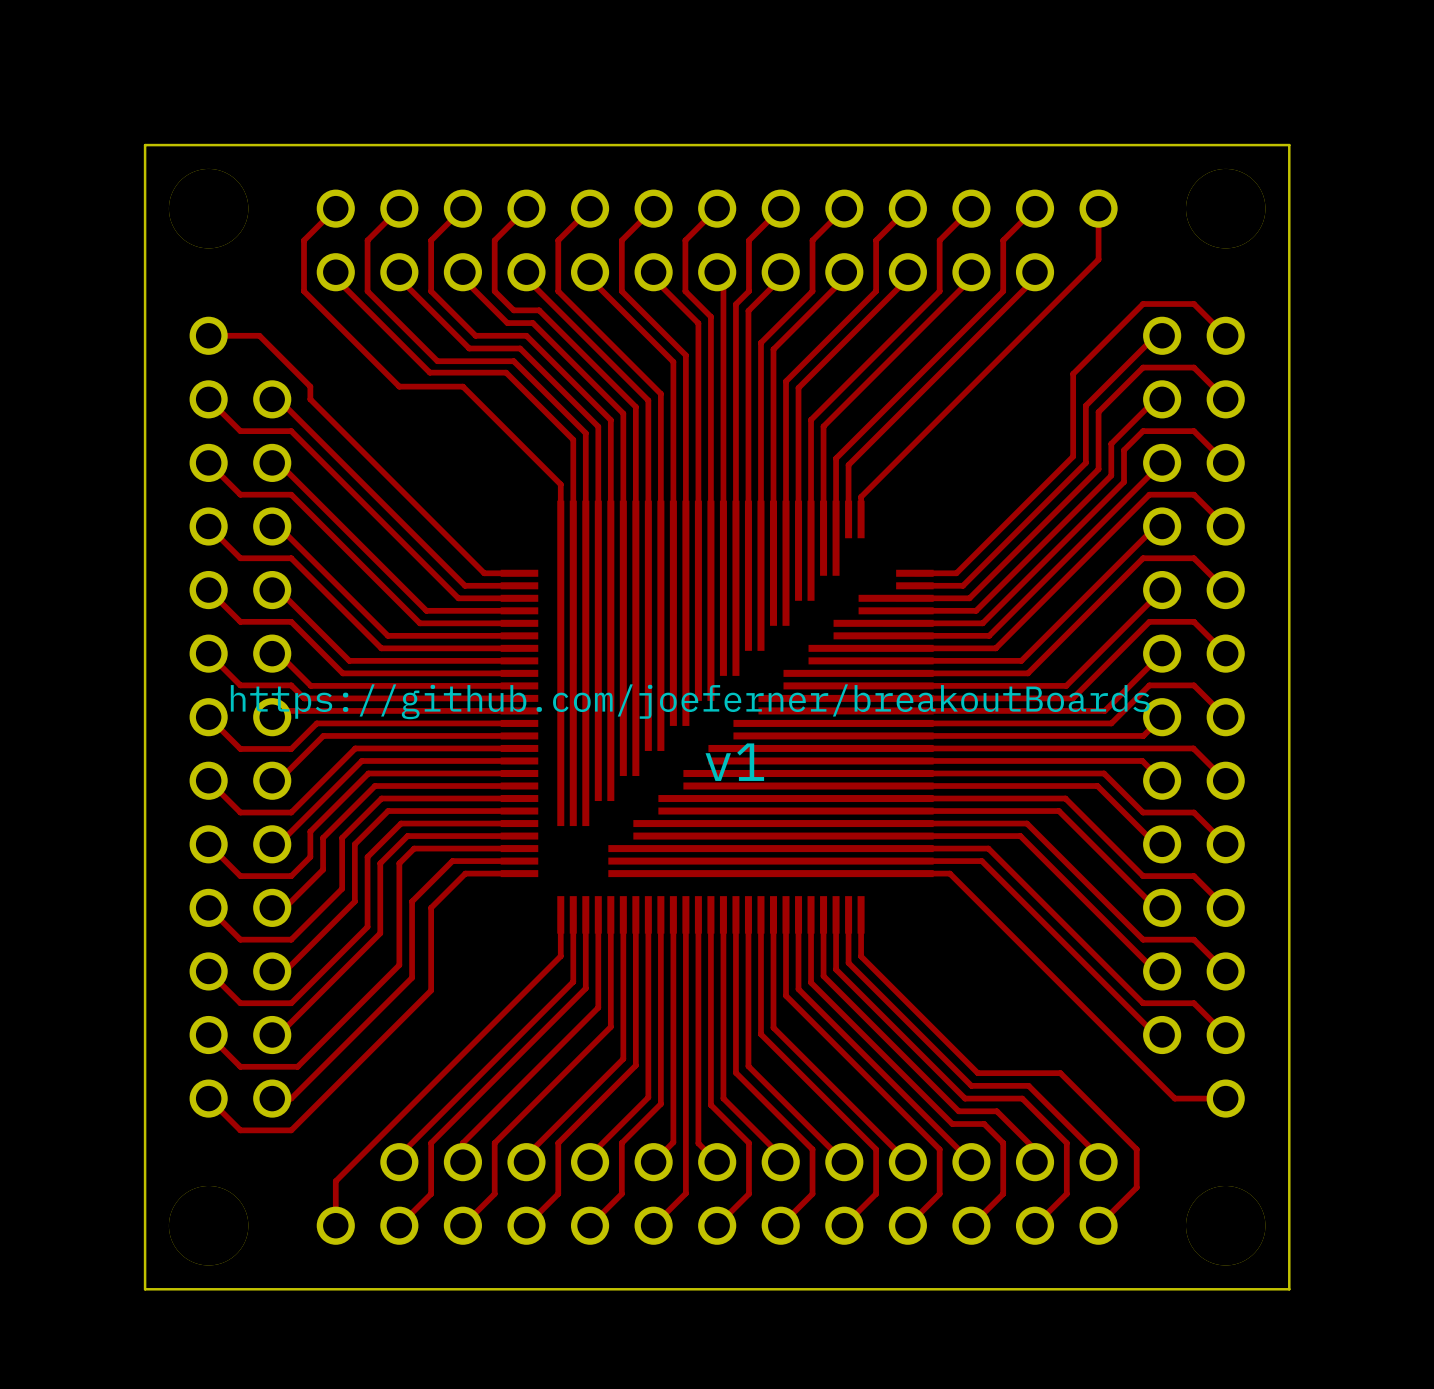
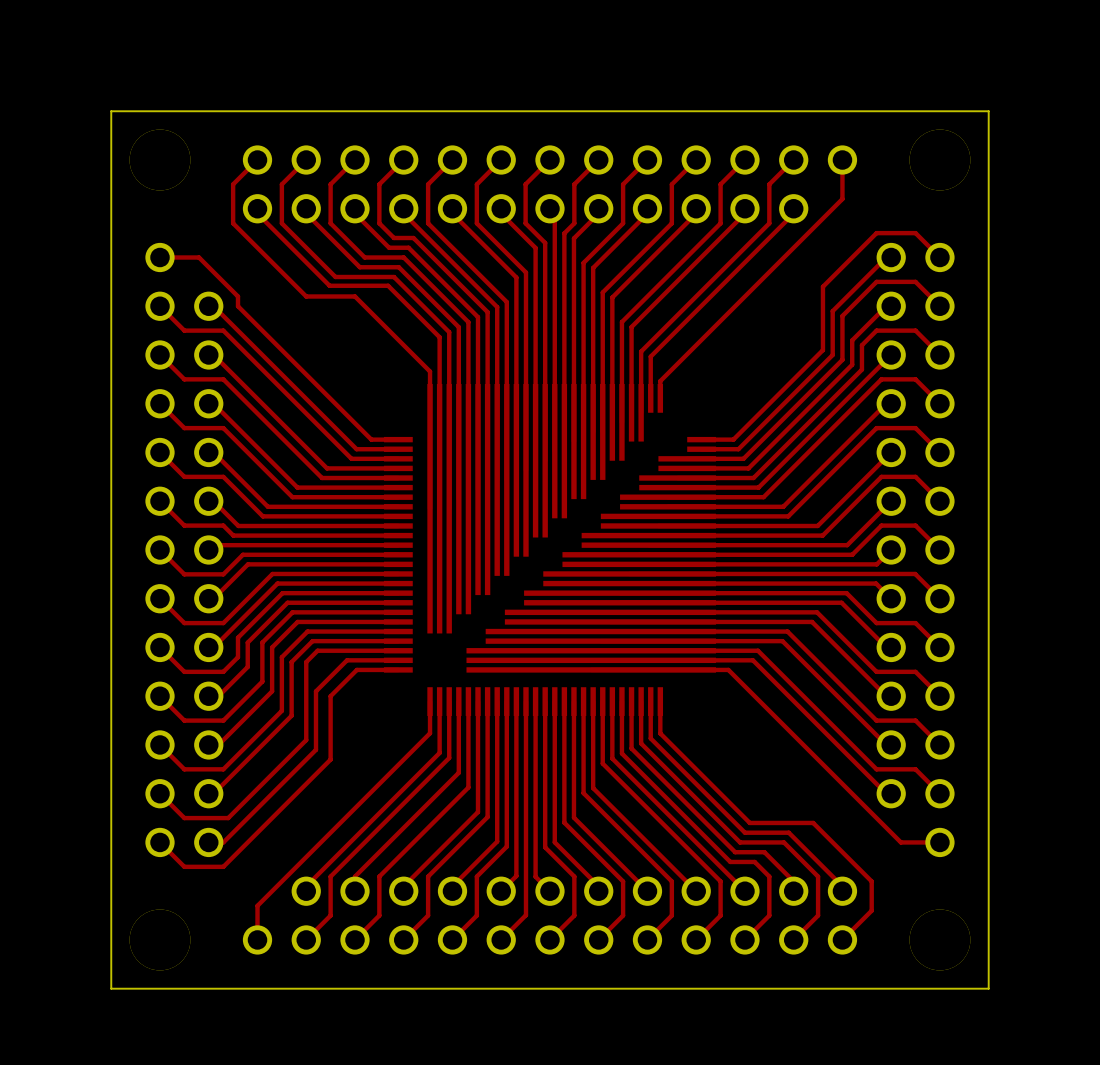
text: https://github.com/joeferner/breakoutBoards (690, 701) -> none
text: v1 (734, 762) -> none

